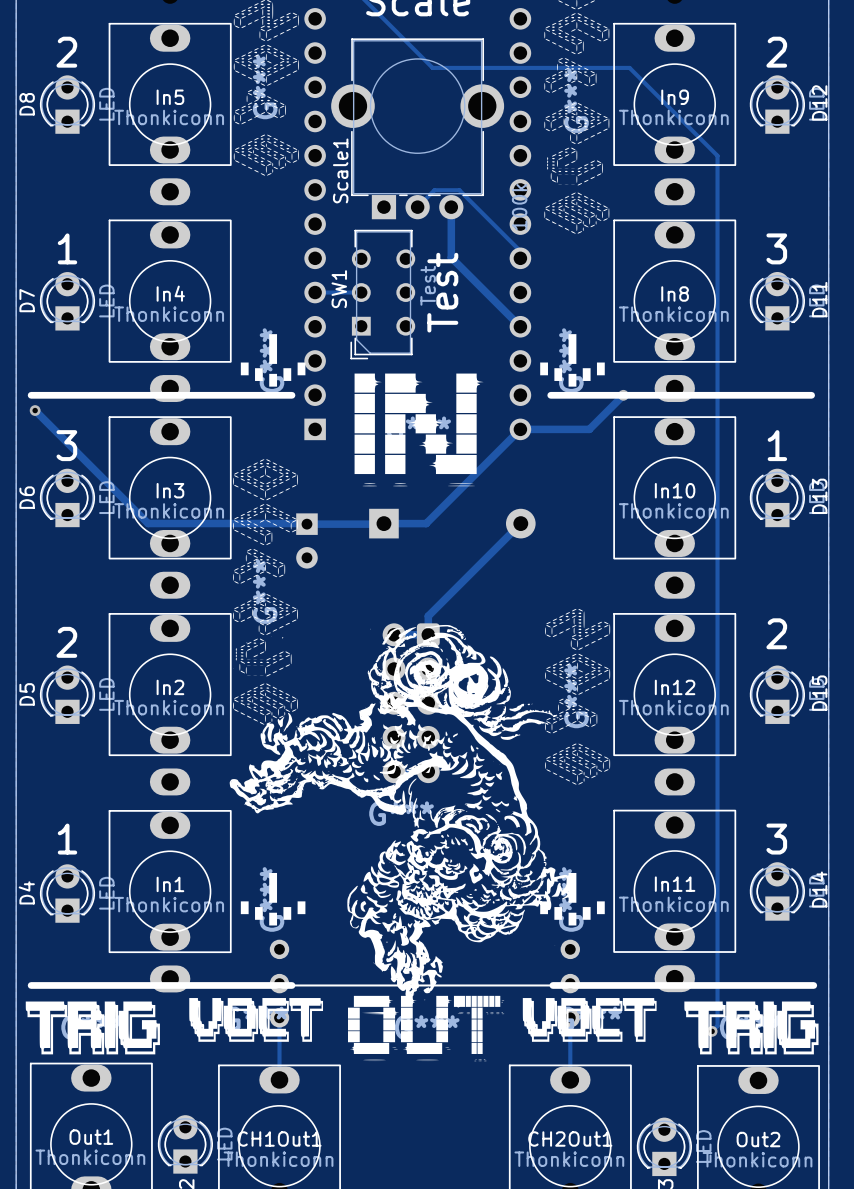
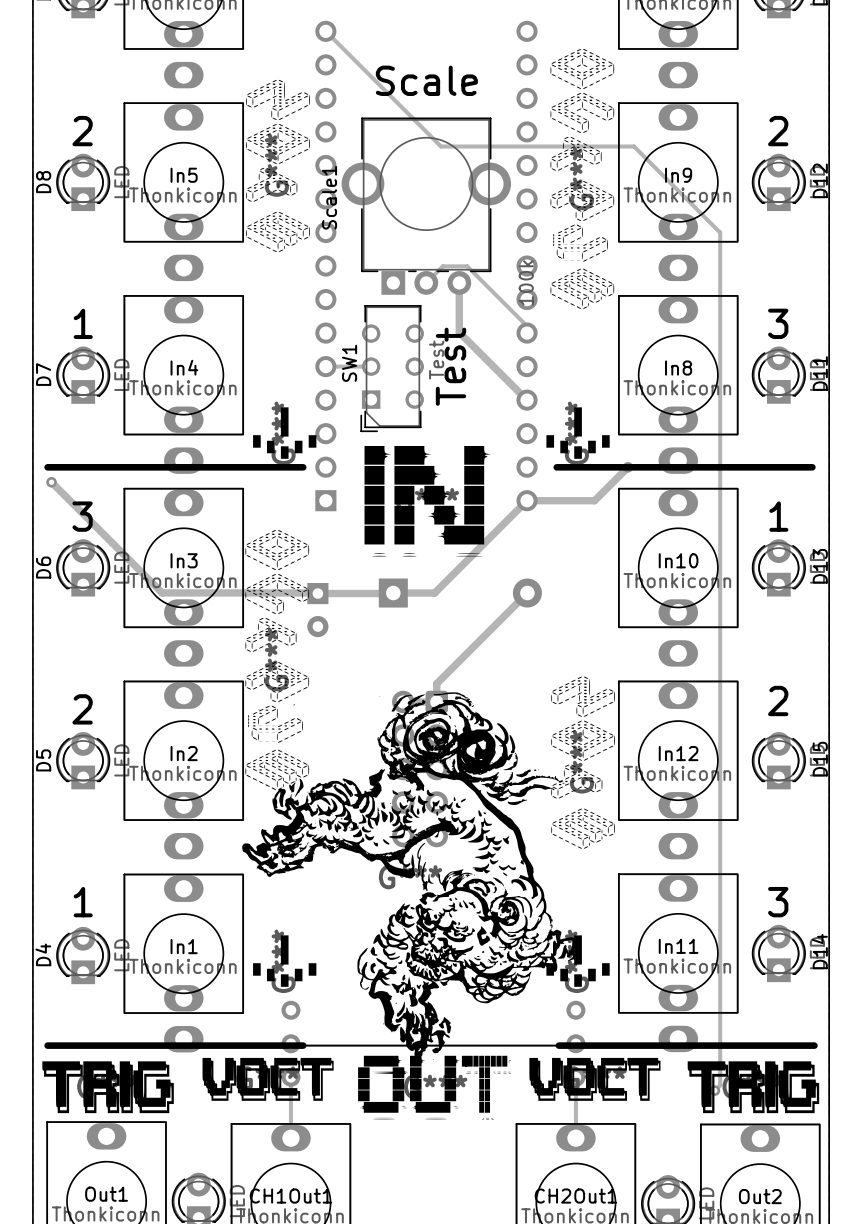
Scale1 name position: Scale1 (340, 170) -> Scale1 (329, 197)

